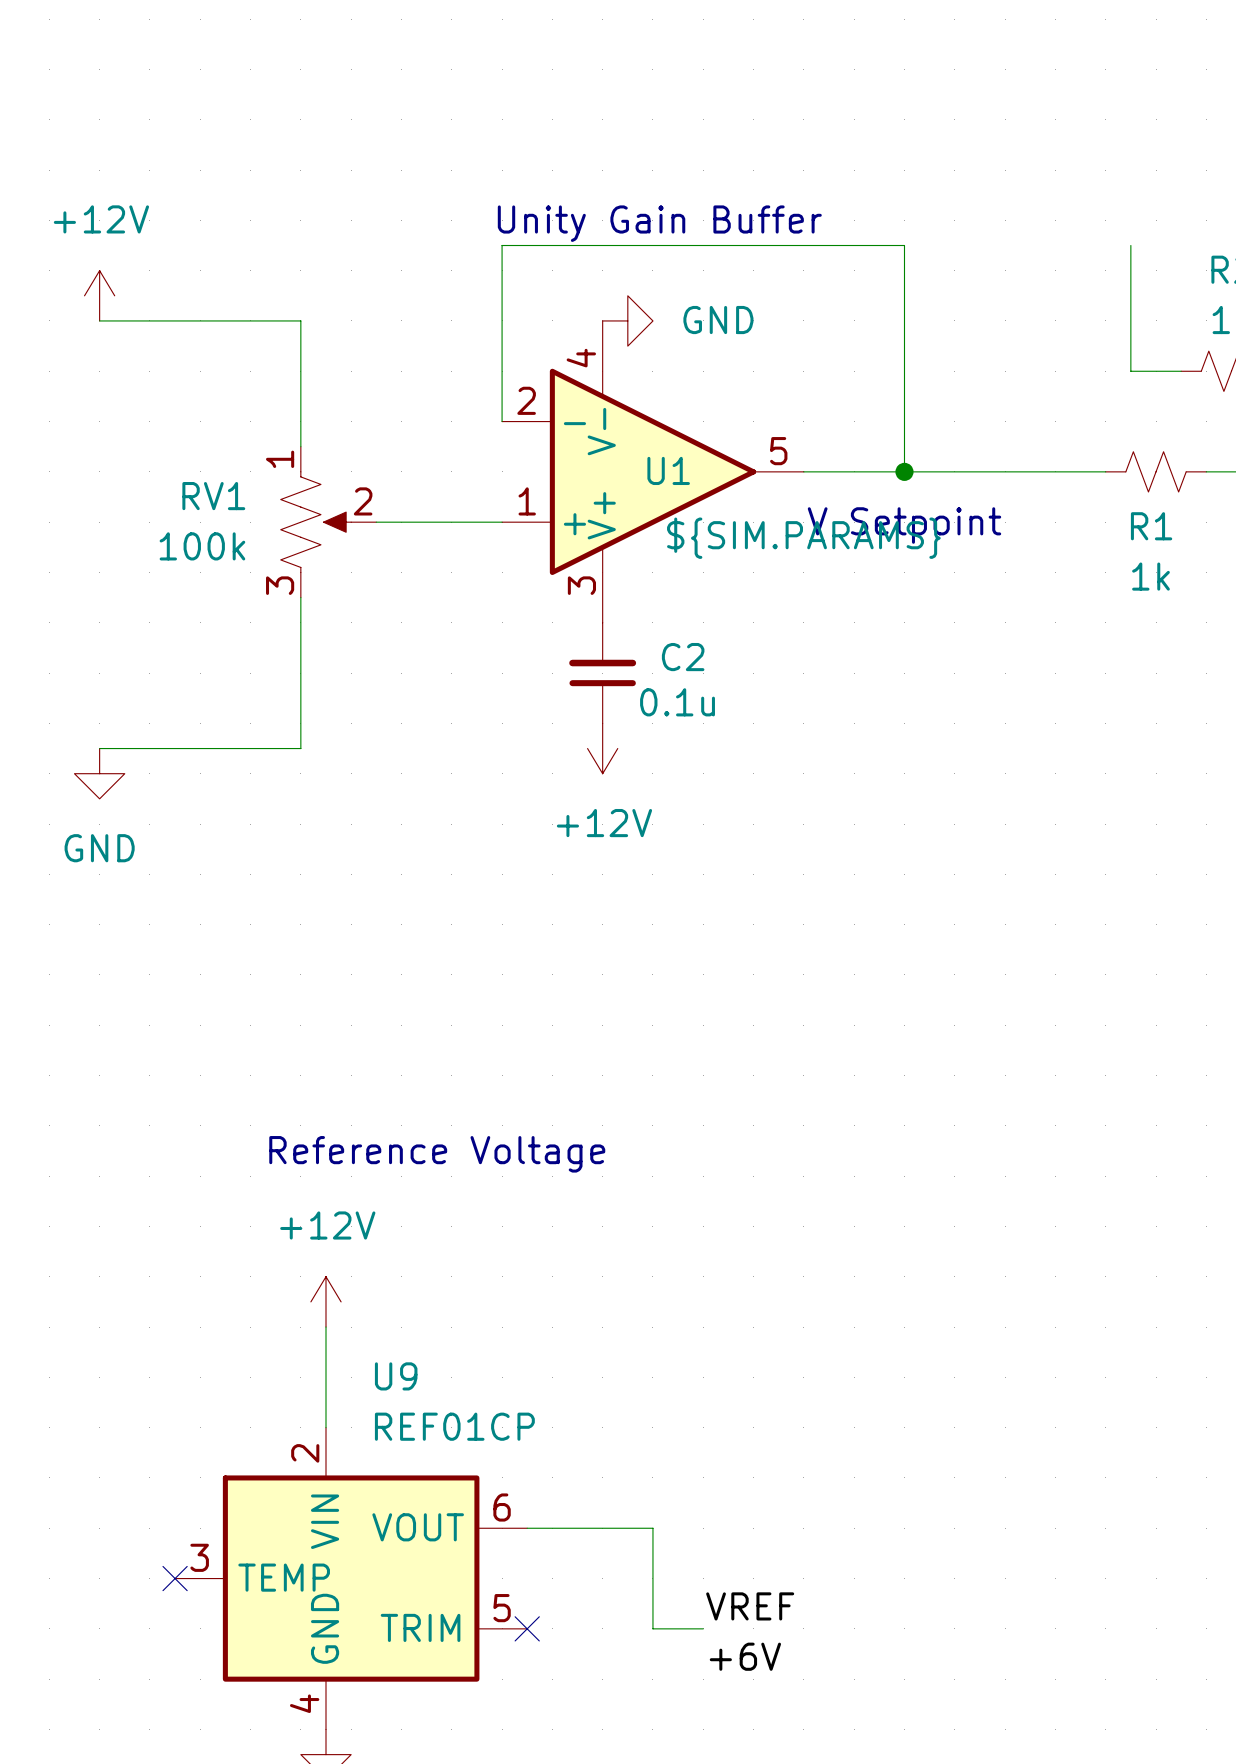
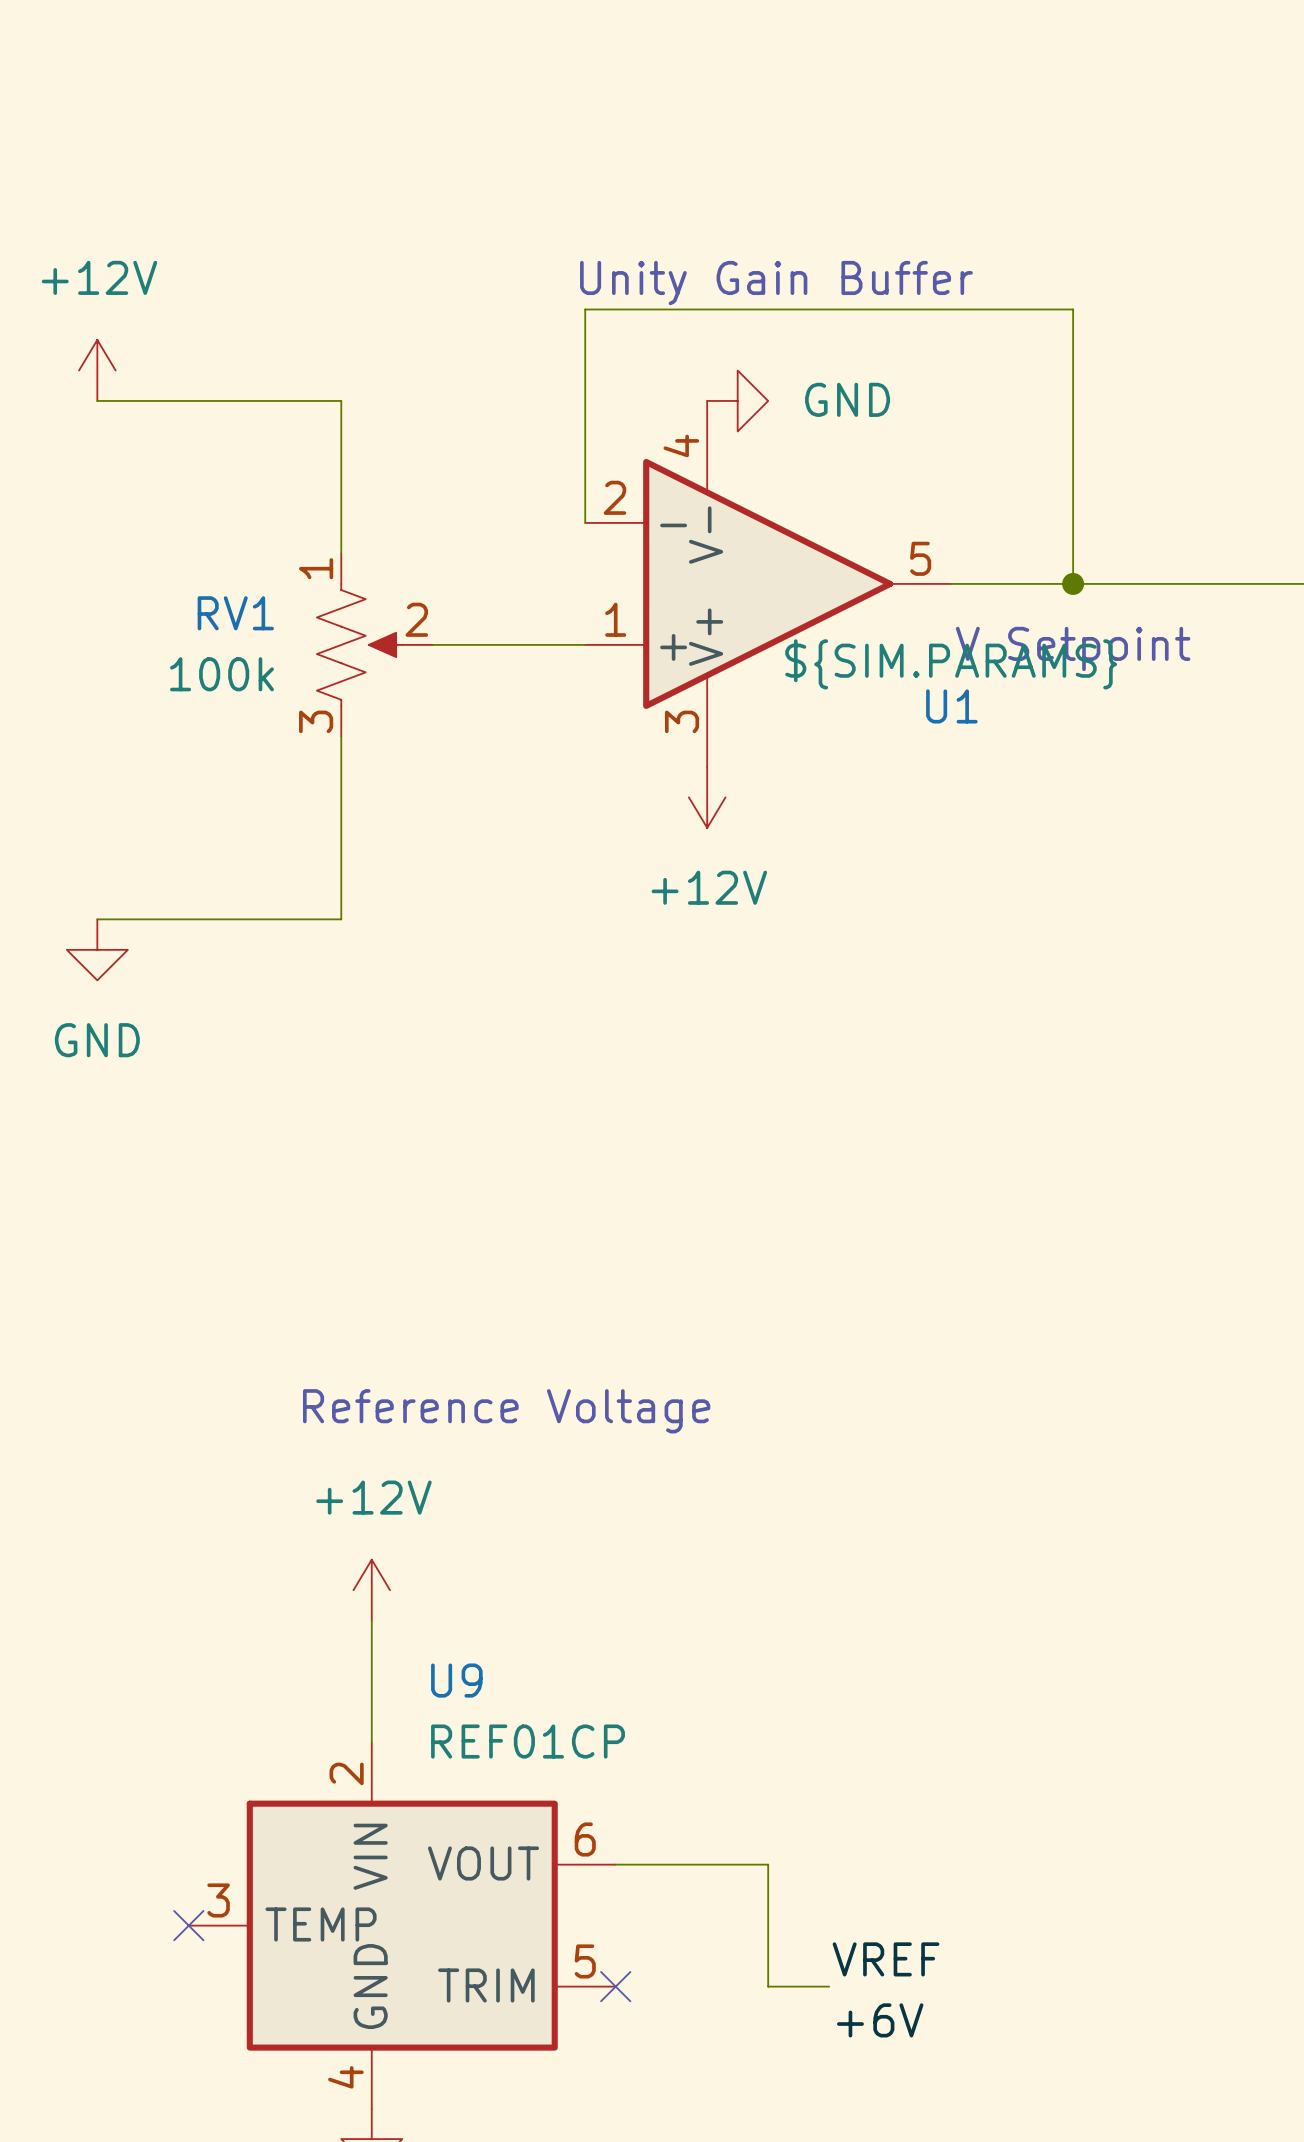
U1 name position: U1 (668, 470) -> U1 (951, 706)
C2: 0.1u (602, 673) -> none
power symbol position: +12V (602, 748) -> +12V (707, 797)

